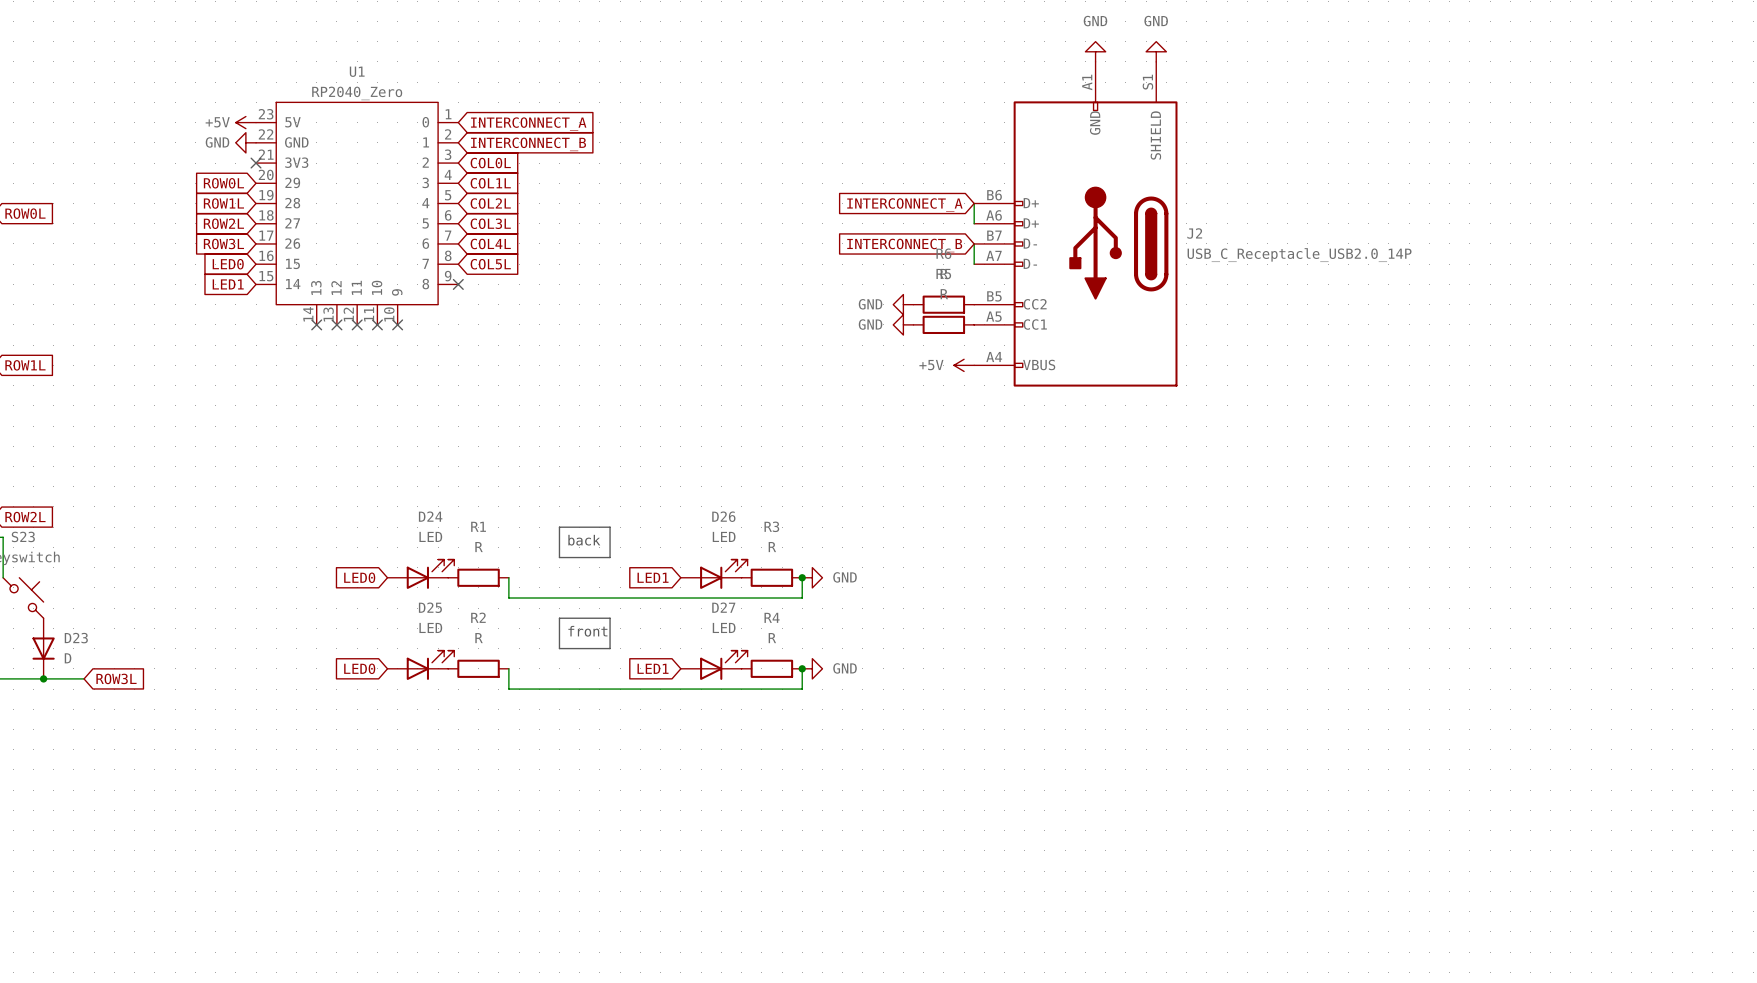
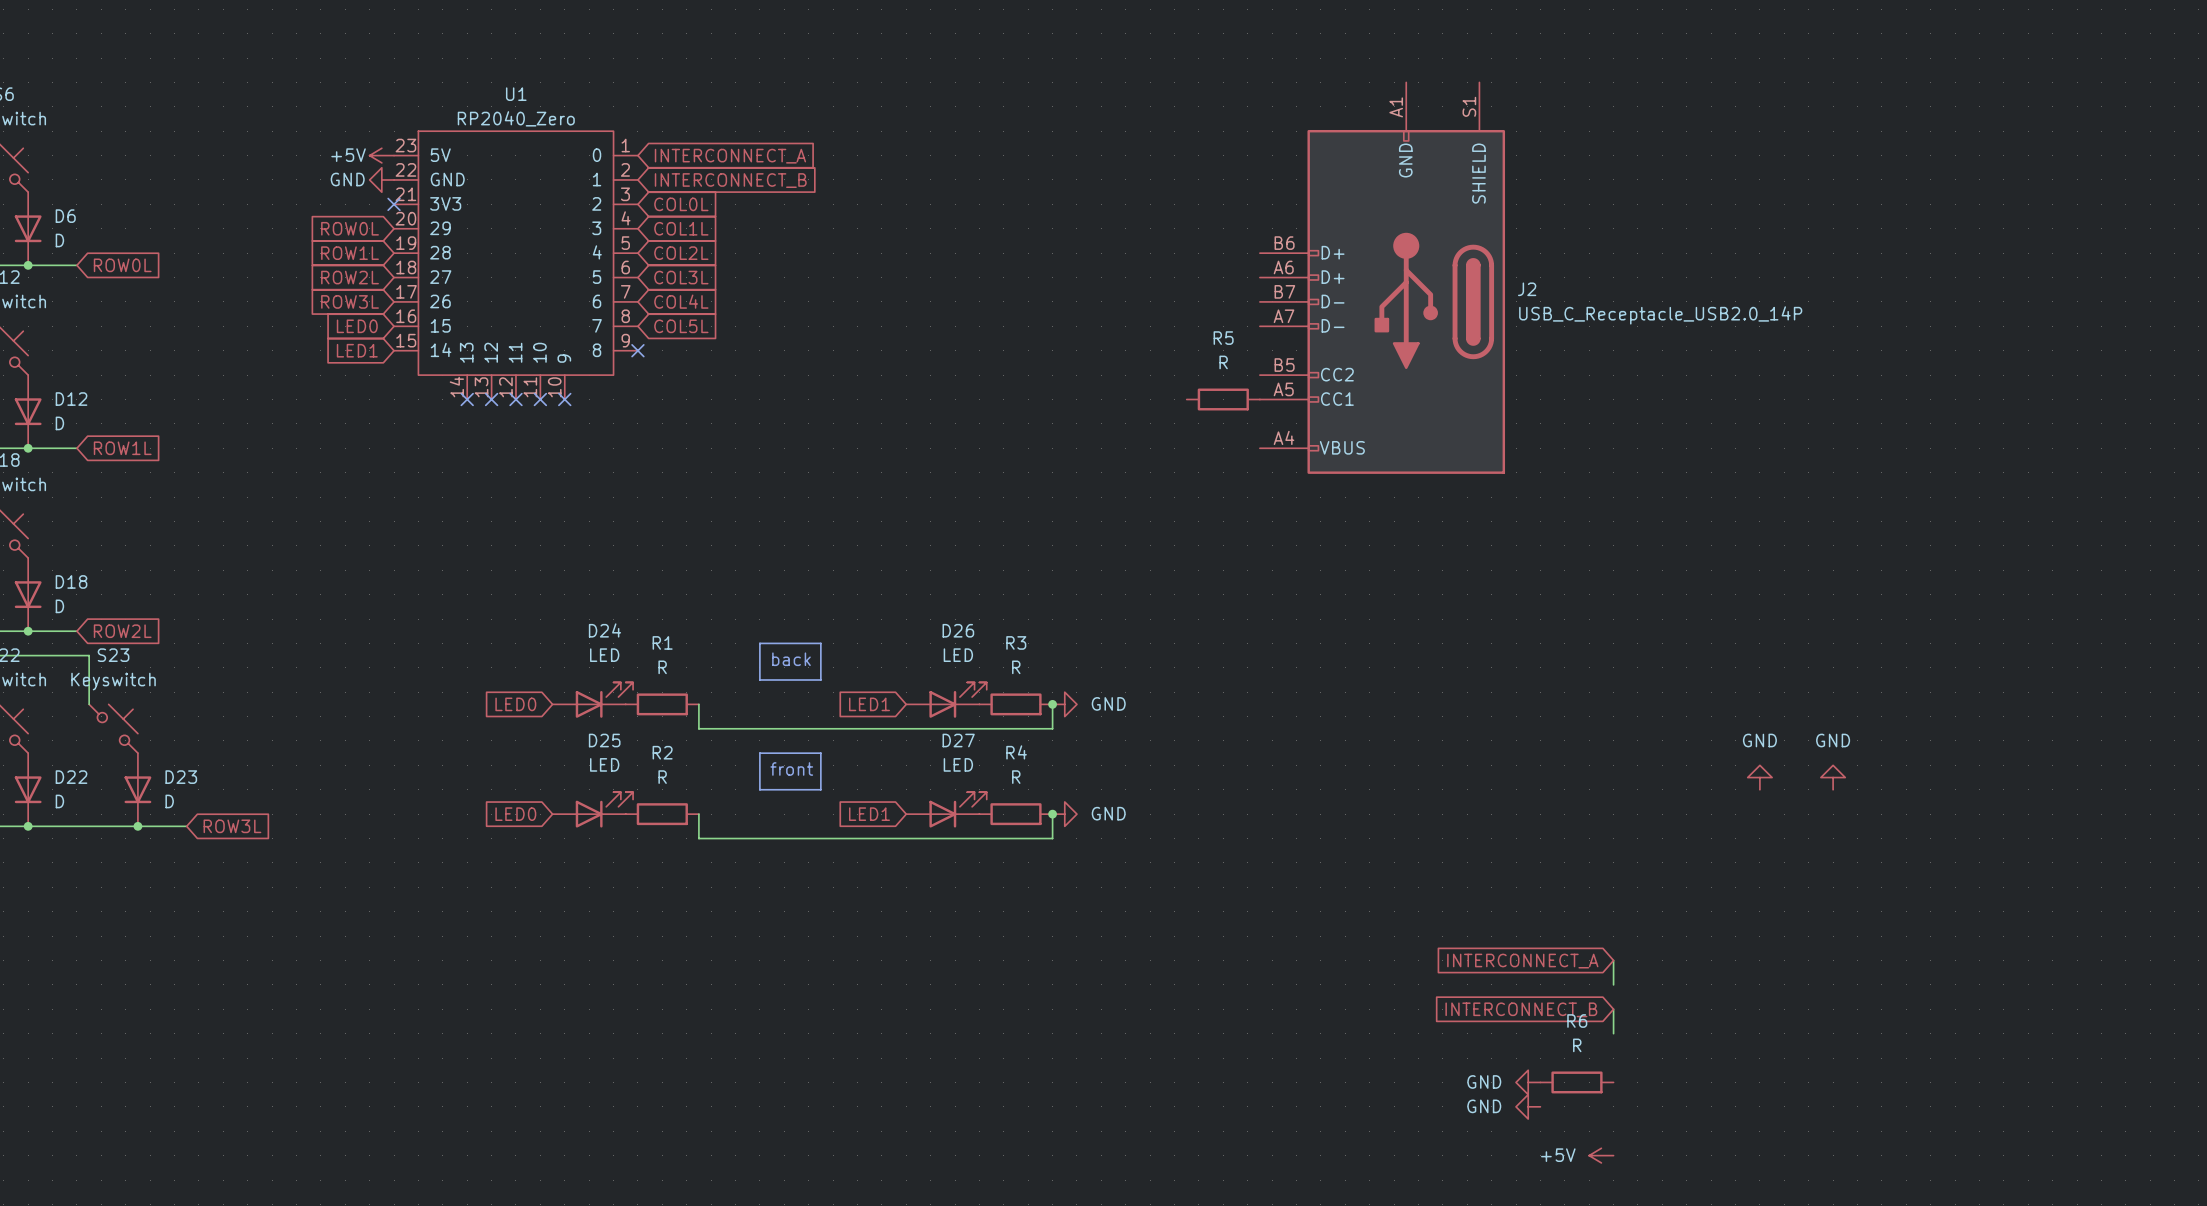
power symbol: GND (1095, 51) -> none
power symbol: GND (1156, 51) -> none
wire: (974, 203) (974, 223) -> none
global label: INTERCONNECT_A (904, 205) -> none
wire: (974, 243) (974, 264) -> none
global label: INTERCONNECT_B (904, 245) -> none
power symbol: GND (903, 304) -> none
R6 position: (943, 304) -> (1576, 1082)
power symbol: GND (903, 324) -> none
power symbol: +5V (964, 365) -> none
power symbol: none -> GND (1759, 777)
power symbol: none -> GND (1833, 777)
wire: none -> (1613, 960) (1613, 984)
global label: none -> INTERCONNECT_A (1522, 961)
wire: none -> (1613, 1009) (1613, 1033)
global label: none -> INTERCONNECT_B (1521, 1009)
power symbol: none -> GND (1528, 1082)
power symbol: none -> GND (1528, 1106)
power symbol: none -> +5V (1601, 1155)

